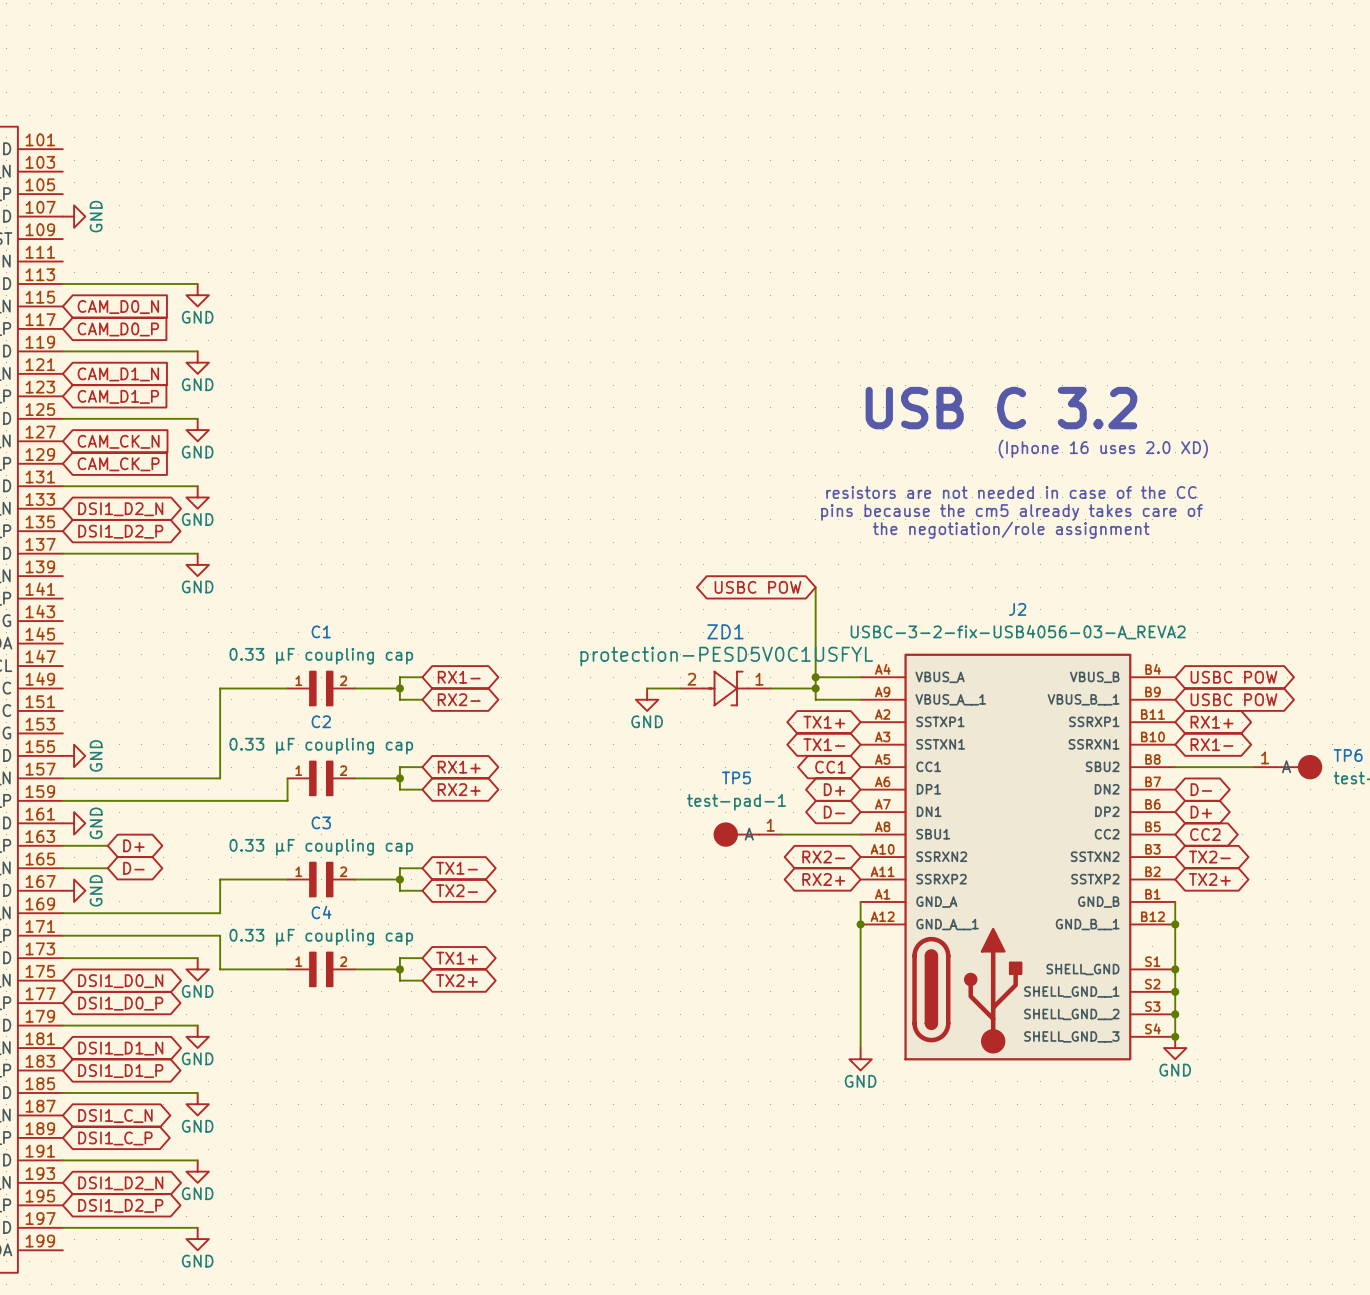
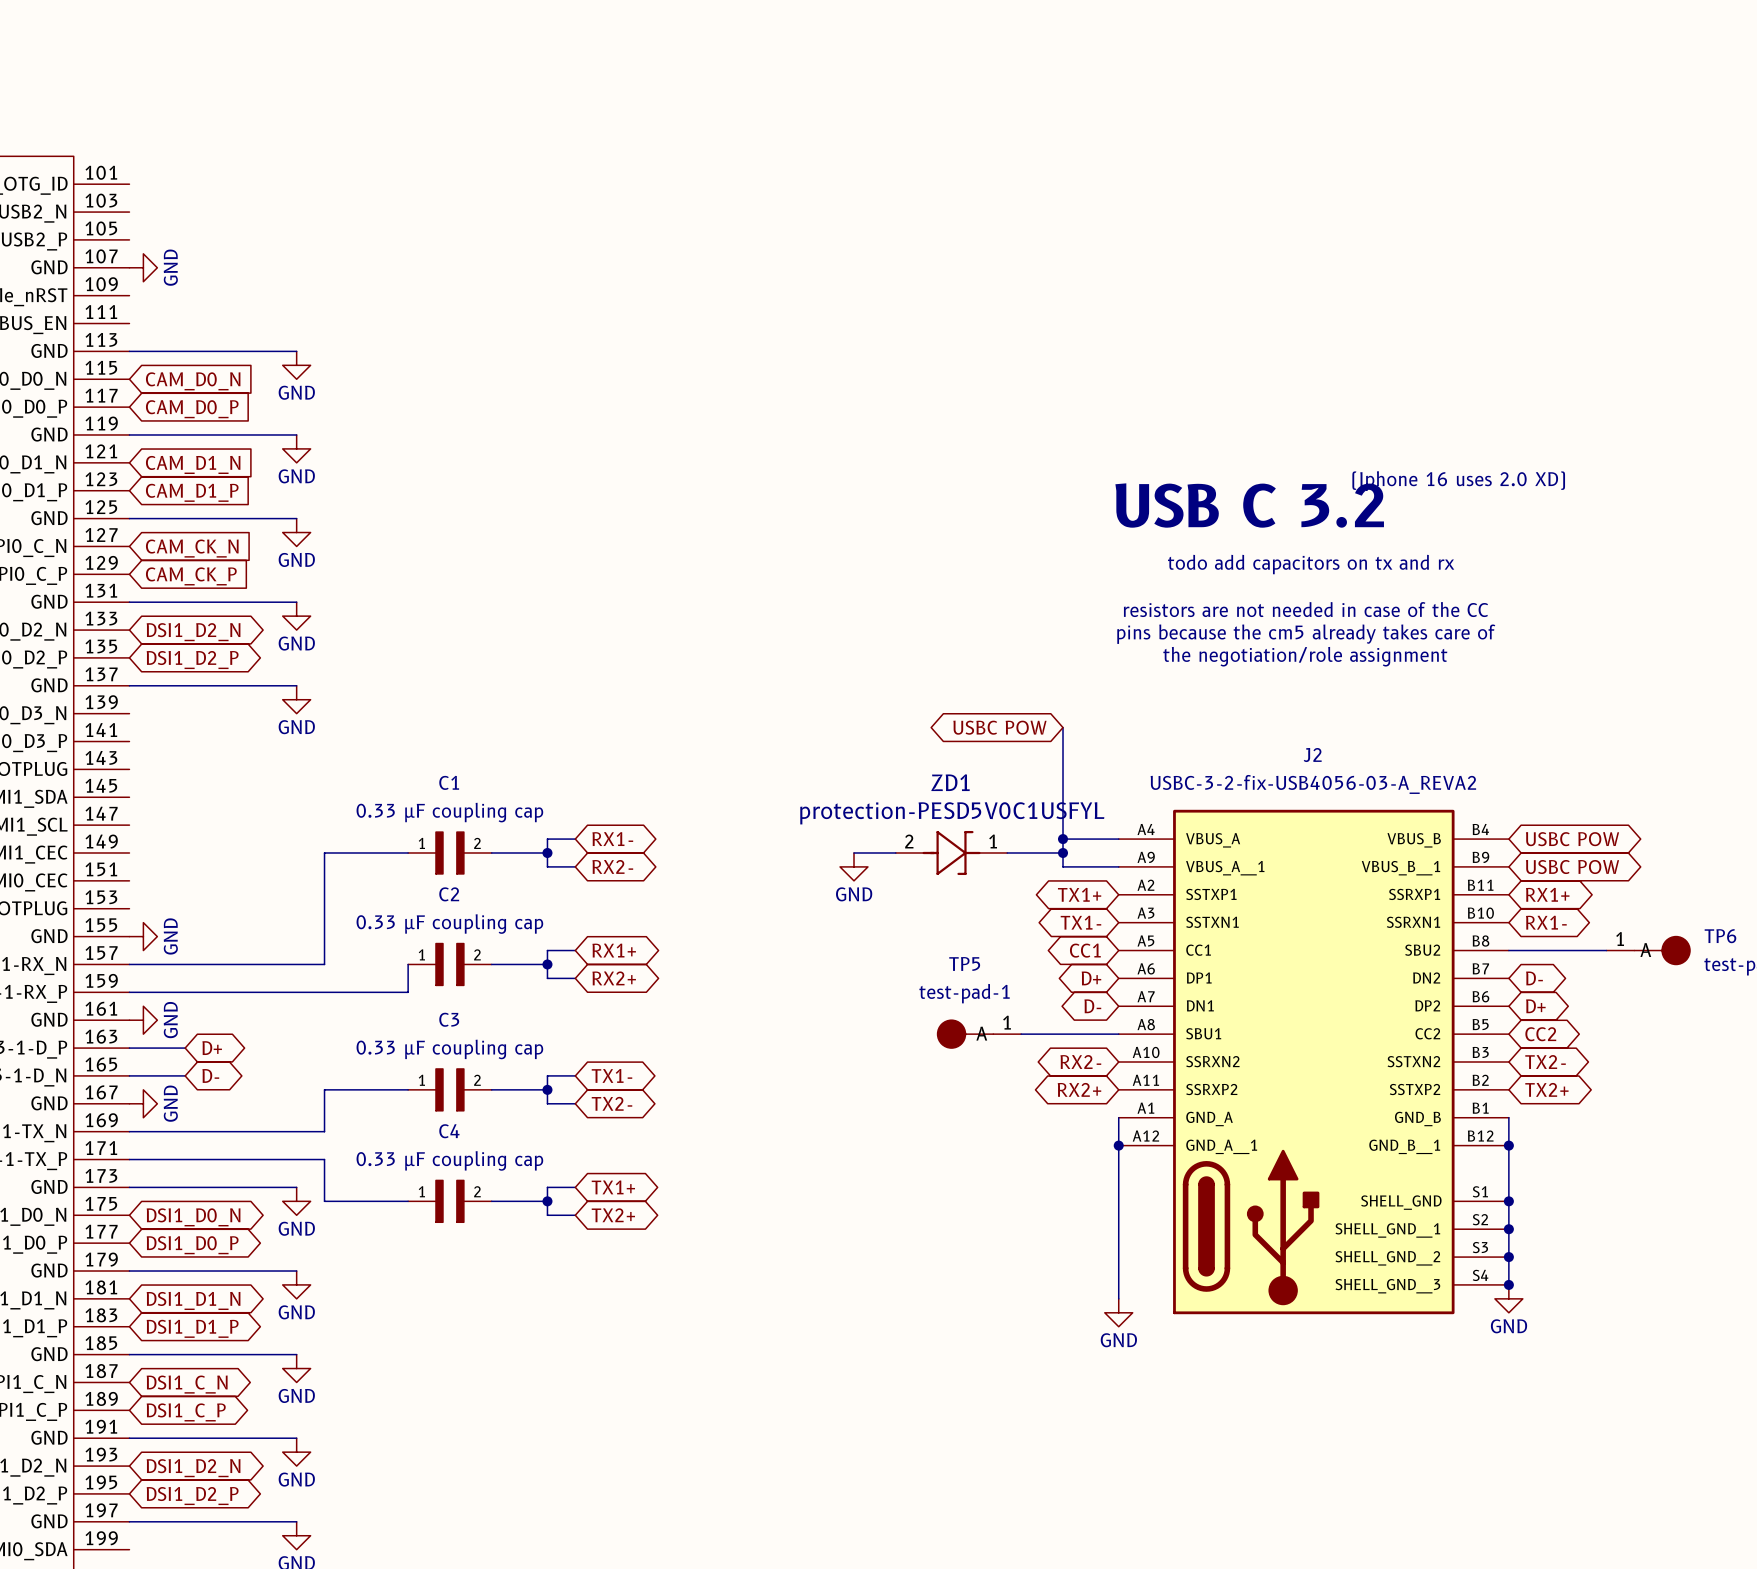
text position: (Iphone 16 uses 2.0 XD) (1103, 449) -> (Iphone 16 uses 2.0 XD) (1458, 480)
text: none -> todo add capacitors on tx and rx (1311, 564)

